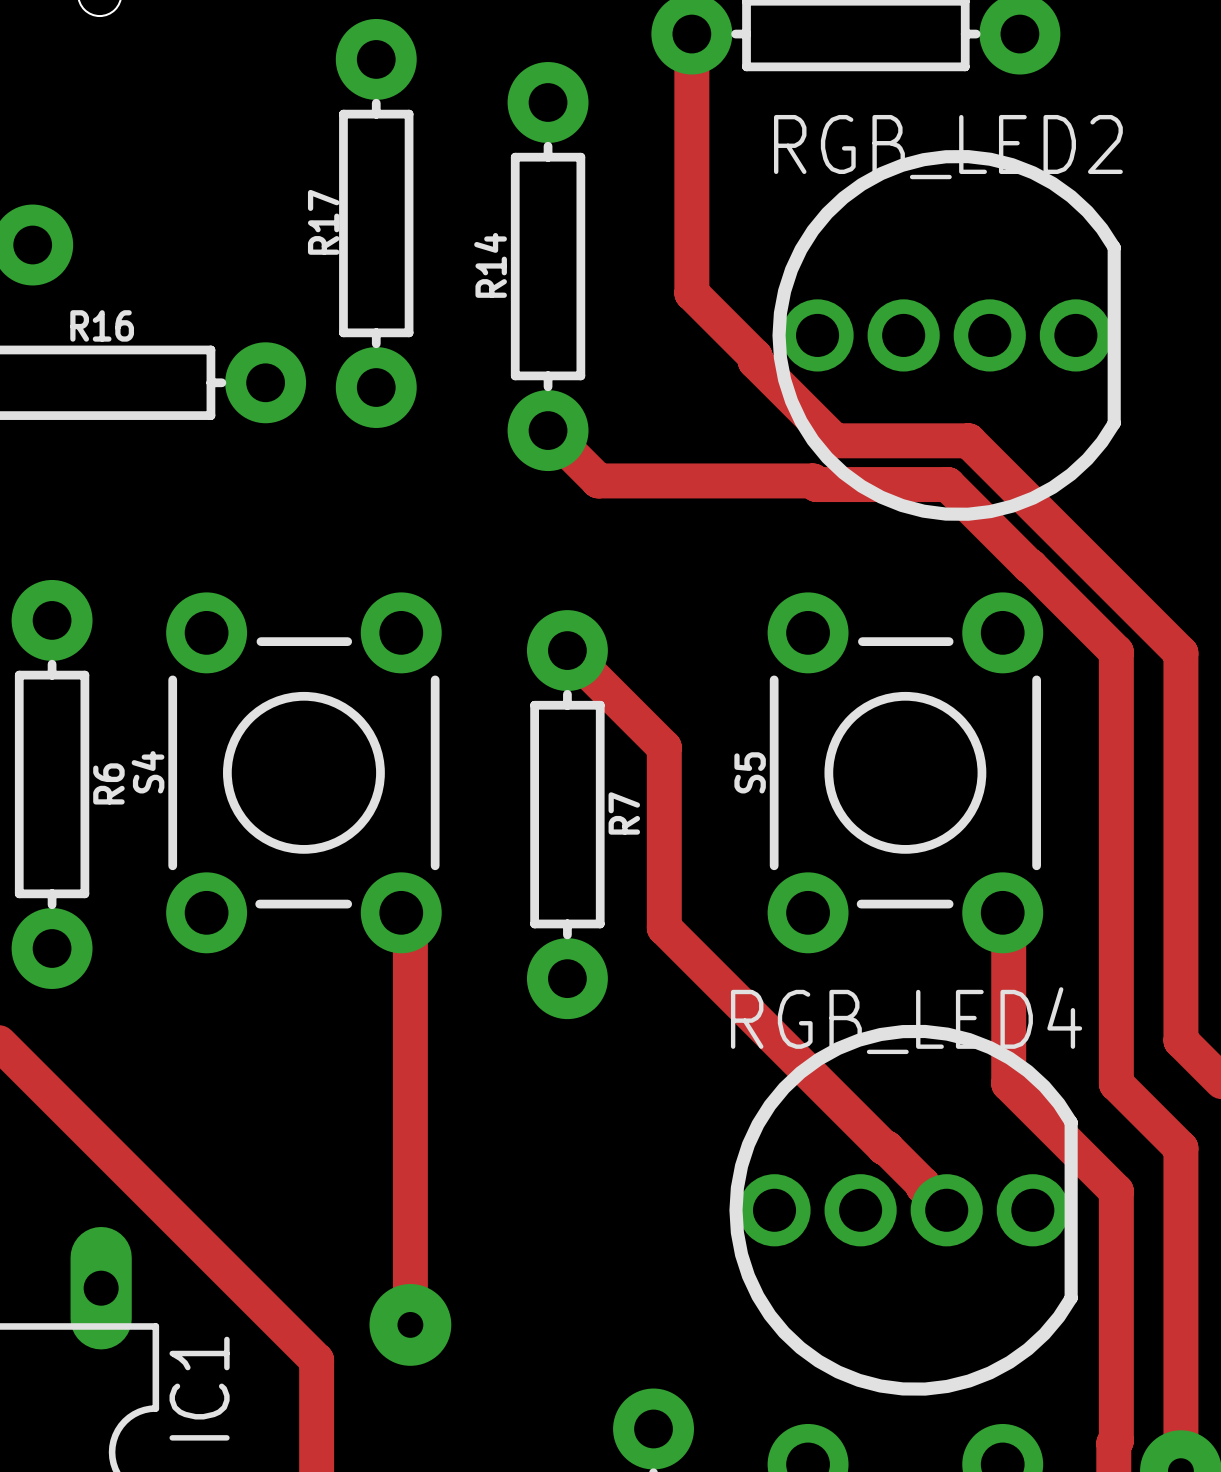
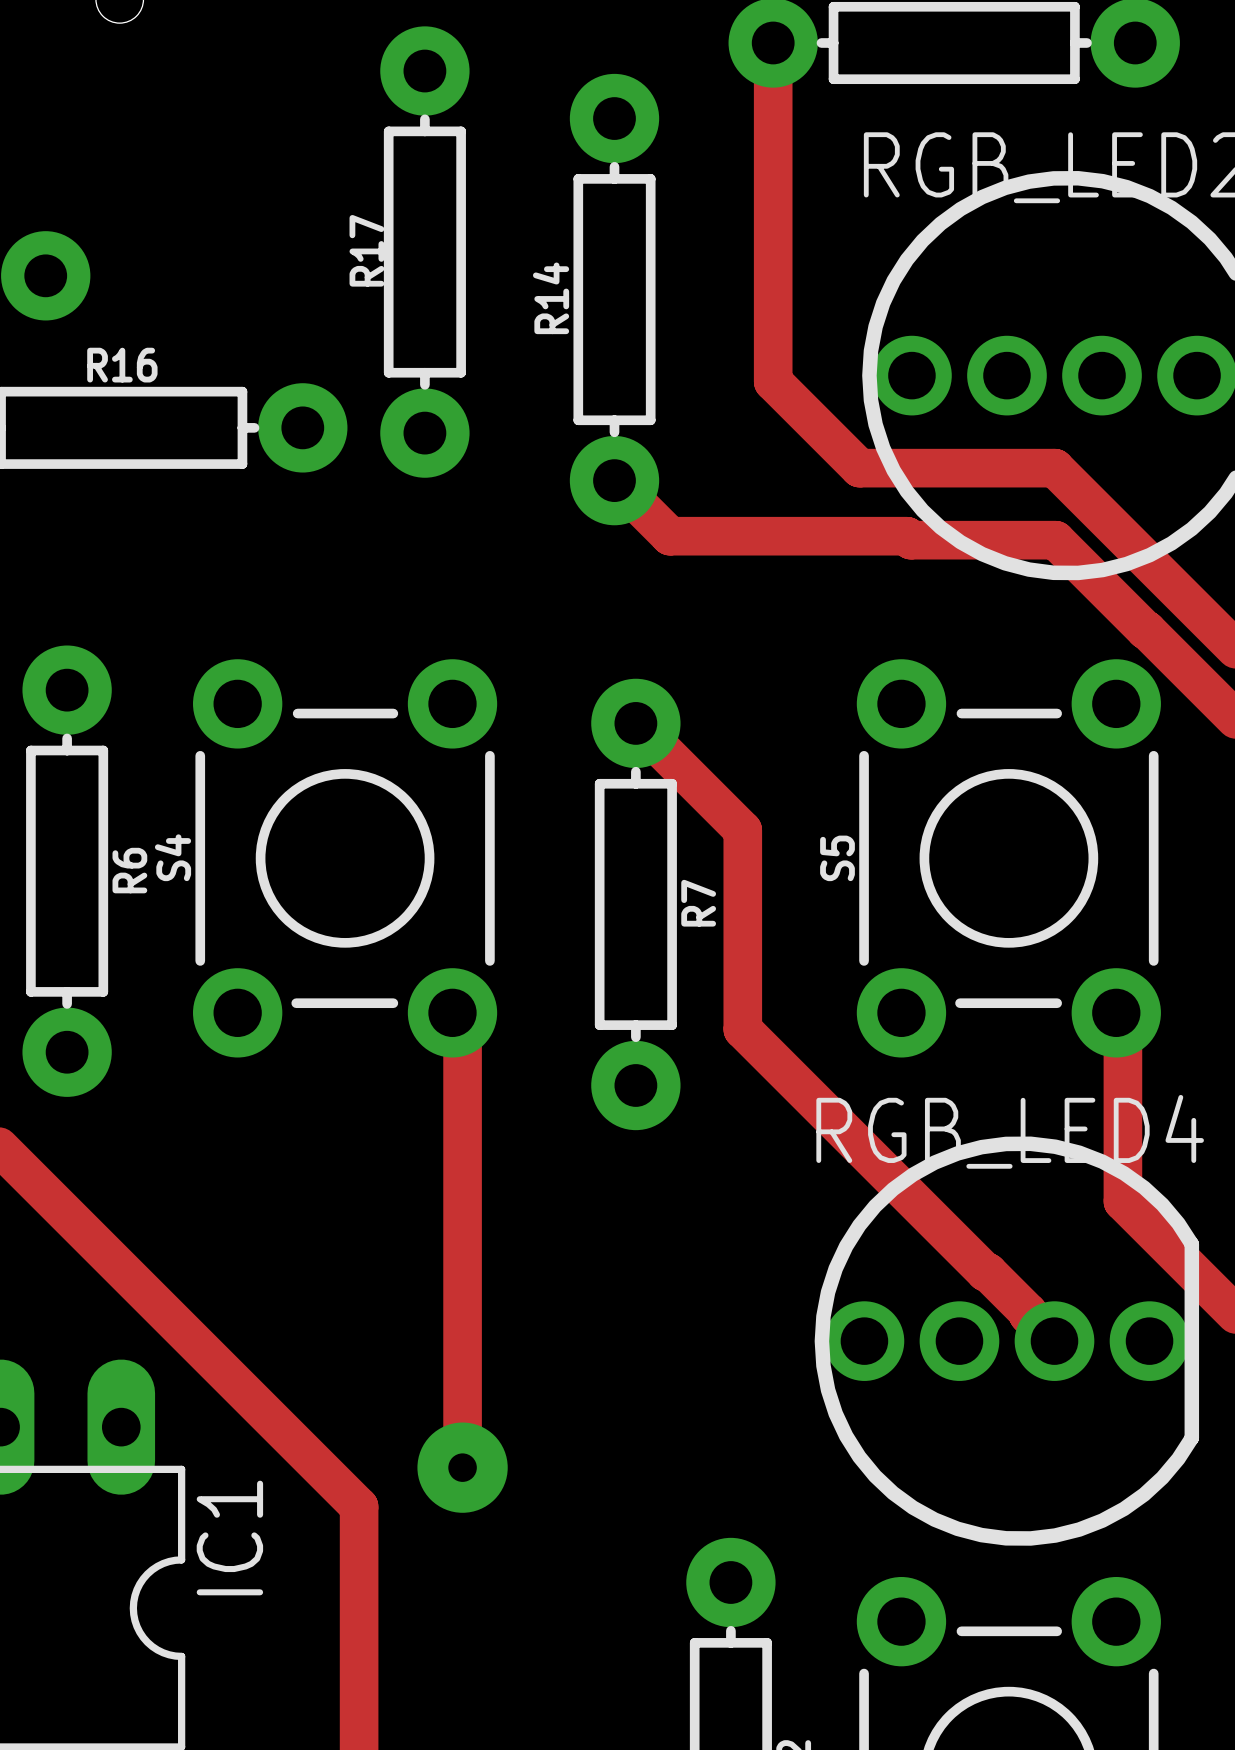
track: (691, 293) (755, 356) (755, 361) (834, 440) (968, 440) -> (773, 329) (773, 381) (859, 468) (1054, 468) (1078, 491)

